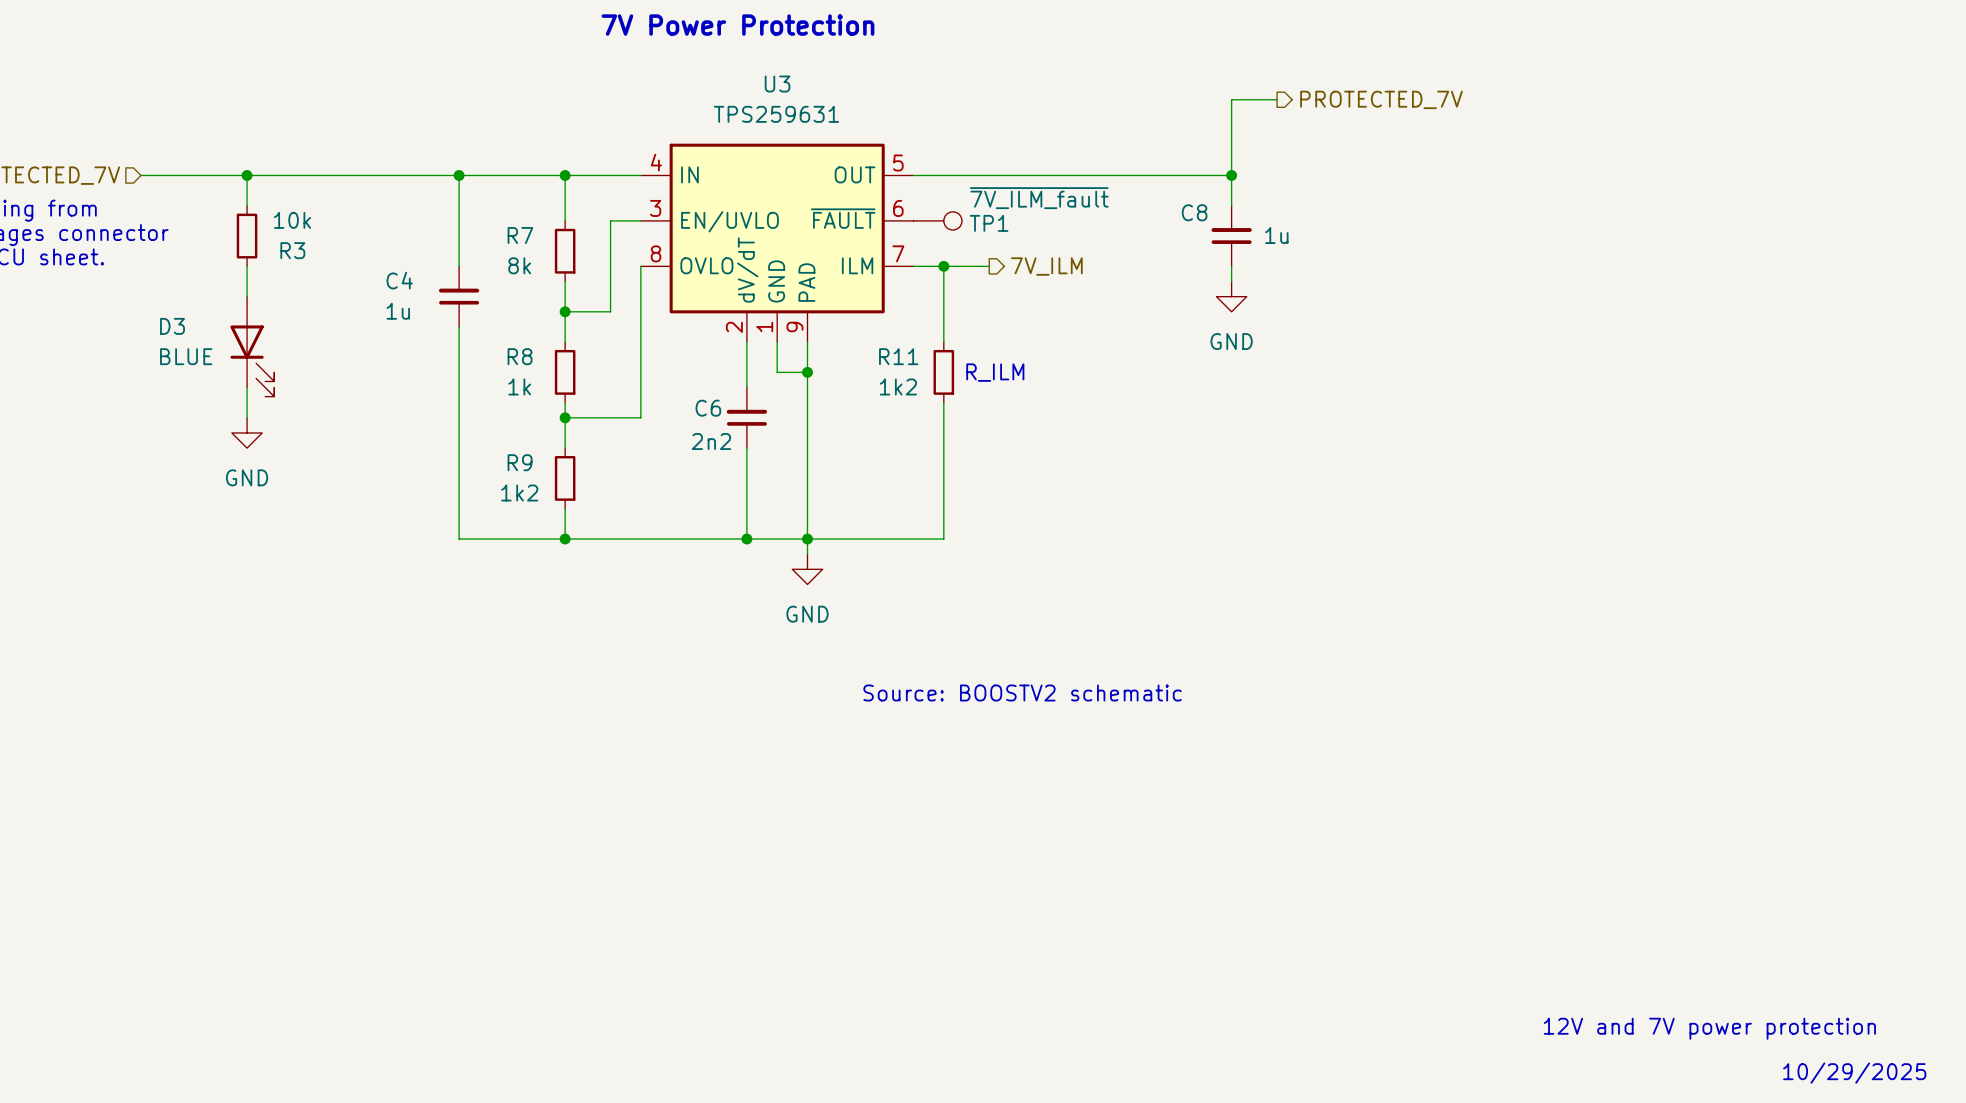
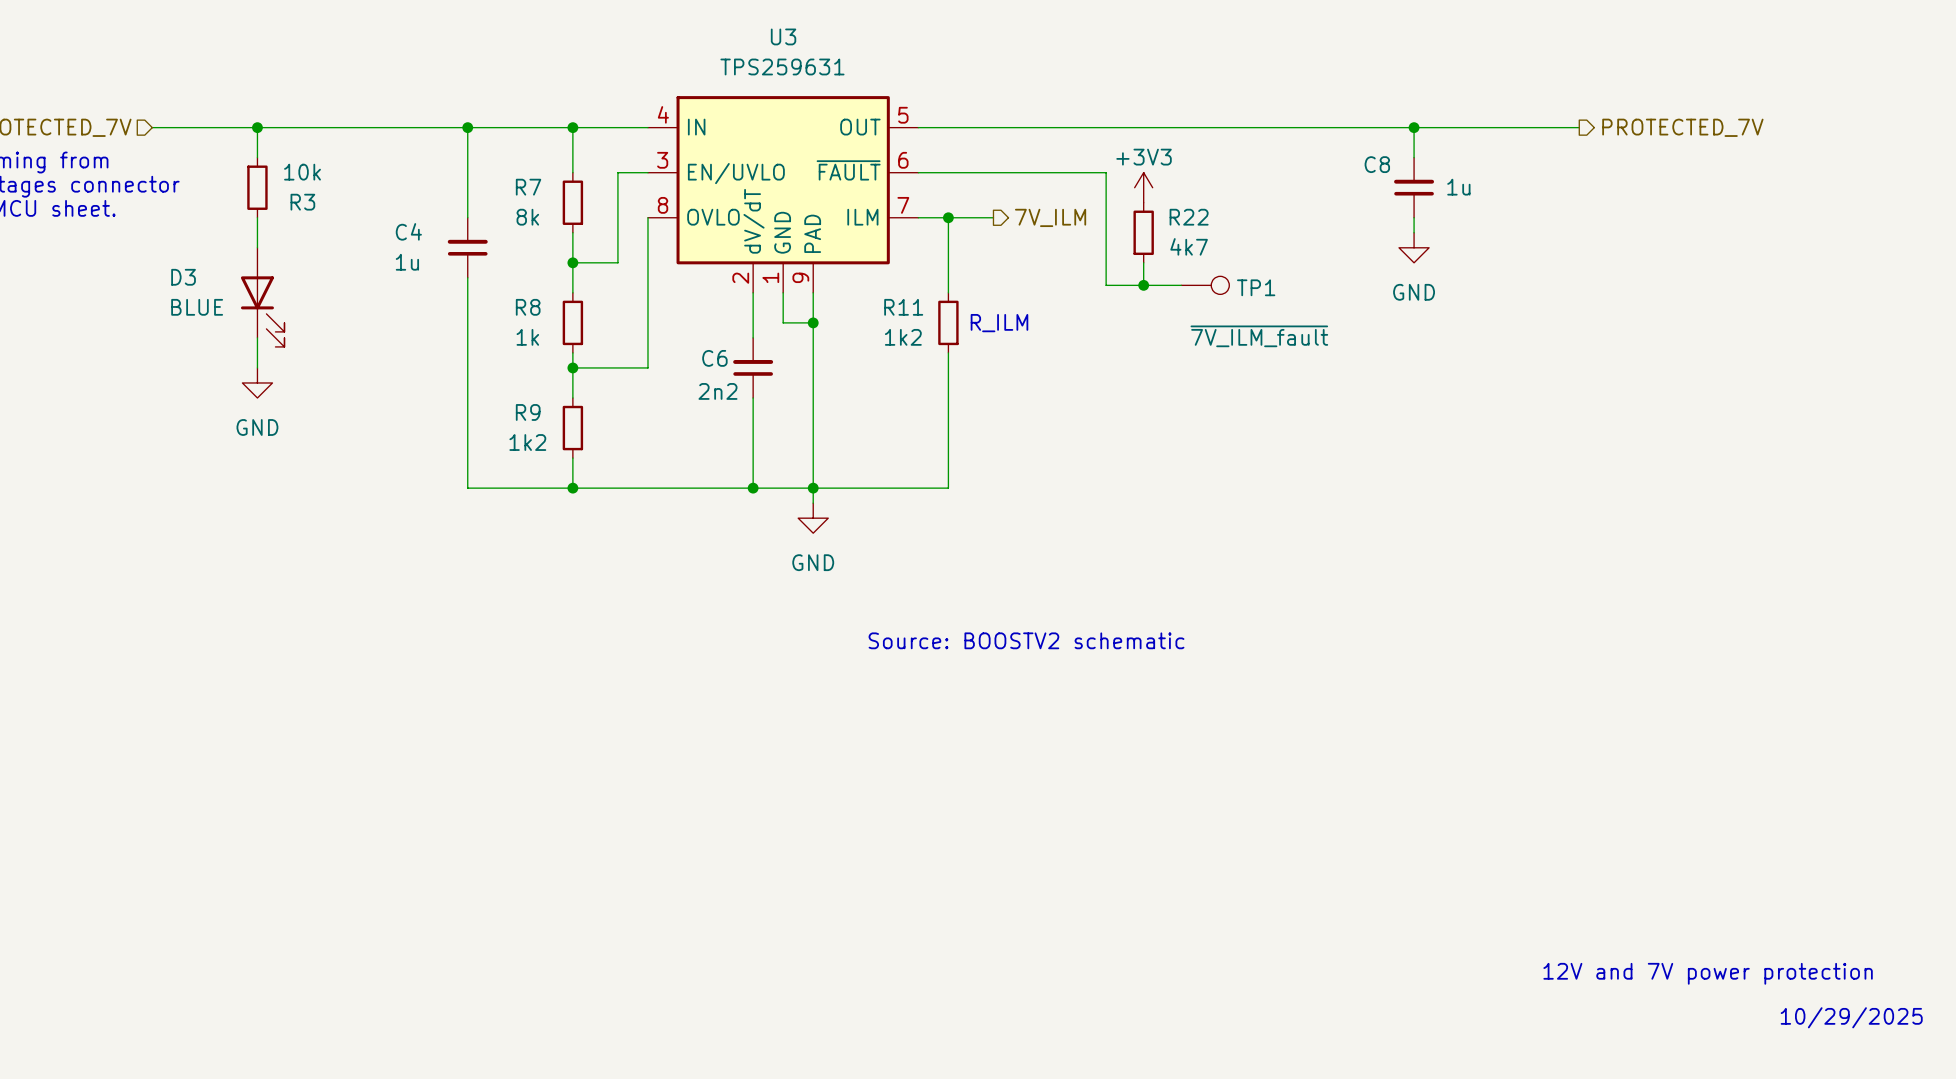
wire: (1277, 99) (1231, 99) (1231, 205) -> none
hierarchical label: PROTECTED_7V (1381, 99) -> none
wire: none -> (1233, 127) (1579, 127)
junction: (1231, 175) -> none
wire: none -> (1414, 127) (1414, 157)
junction: none -> (1414, 127)
hierarchical label: none -> PROTECTED_7V (1682, 127)
TP1 value position: ~{7V_ILM_fault} (1039, 198) -> ~{7V_ILM_fault} (1259, 336)
wire: none -> (918, 172) (1106, 172) (1106, 285) (1181, 285)
TP1 position: (937, 220) -> (1205, 285)
power symbol: none -> +3V3 (1143, 187)
C8 position: (1231, 236) -> (1414, 187)
wire: (1231, 266) (1231, 281) -> (1414, 217) (1414, 232)
R22: none -> 4k7 (1143, 232)
power symbol position: GND (1231, 296) -> GND (1414, 247)
wire: none -> (1143, 262) (1143, 285)
junction: none -> (1143, 285)

